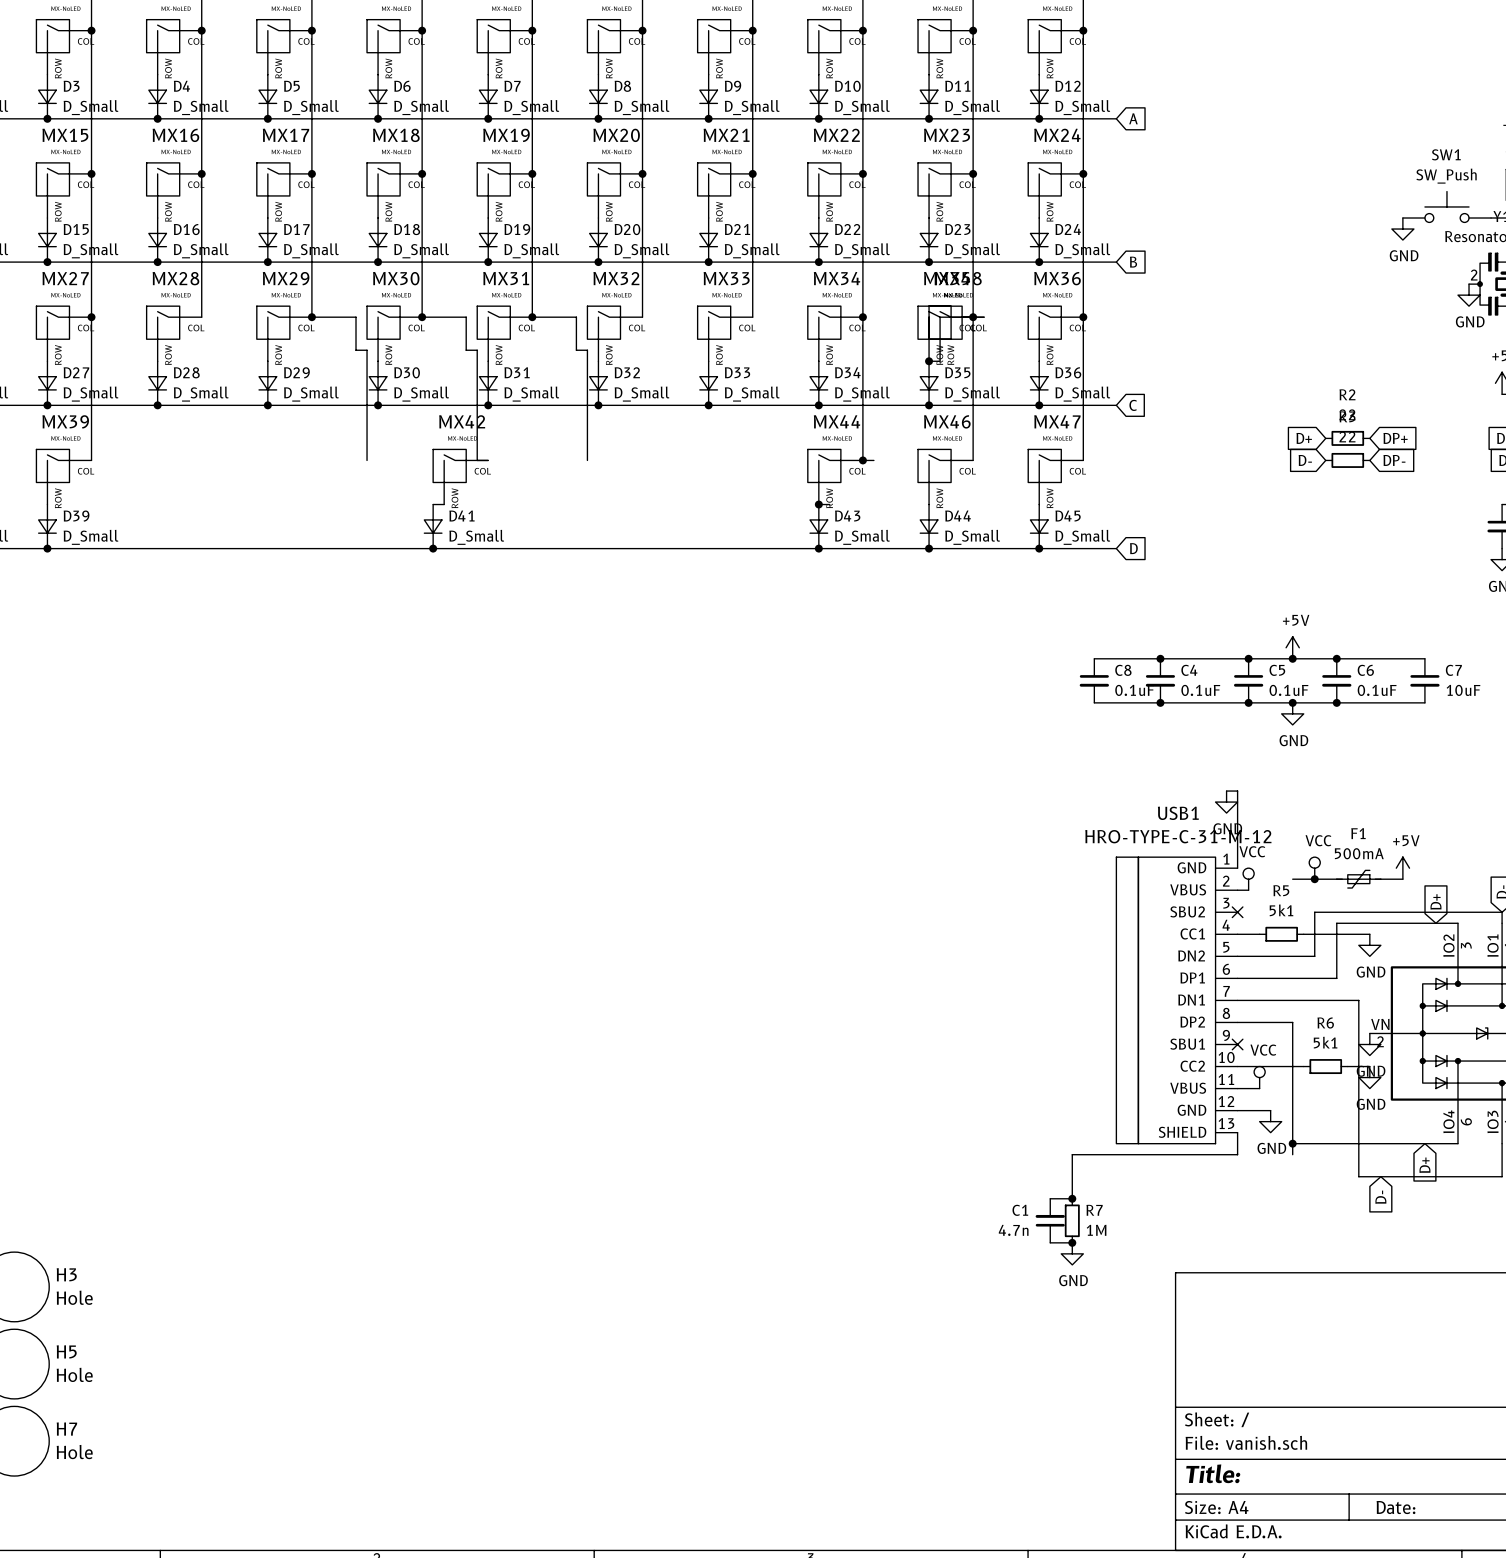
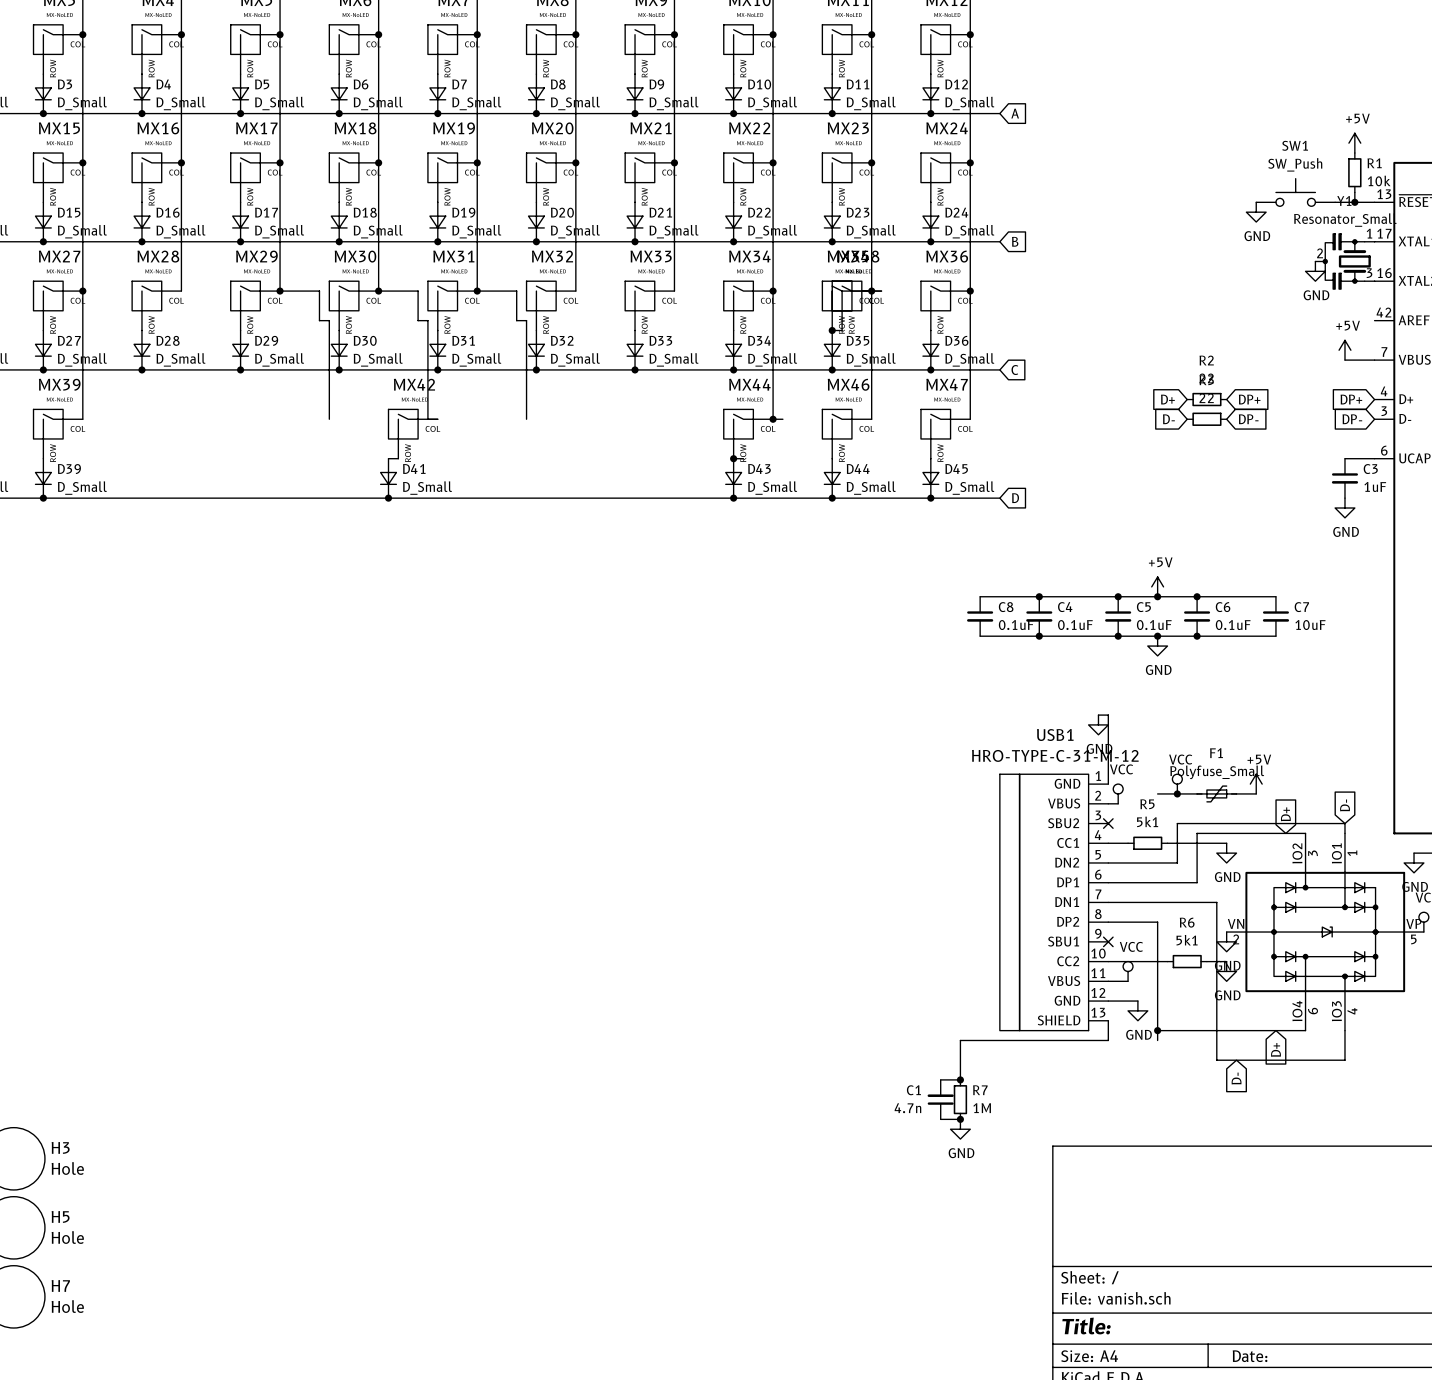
F1 value: 500mA (1359, 853) -> Polyfuse_Small (1217, 772)

